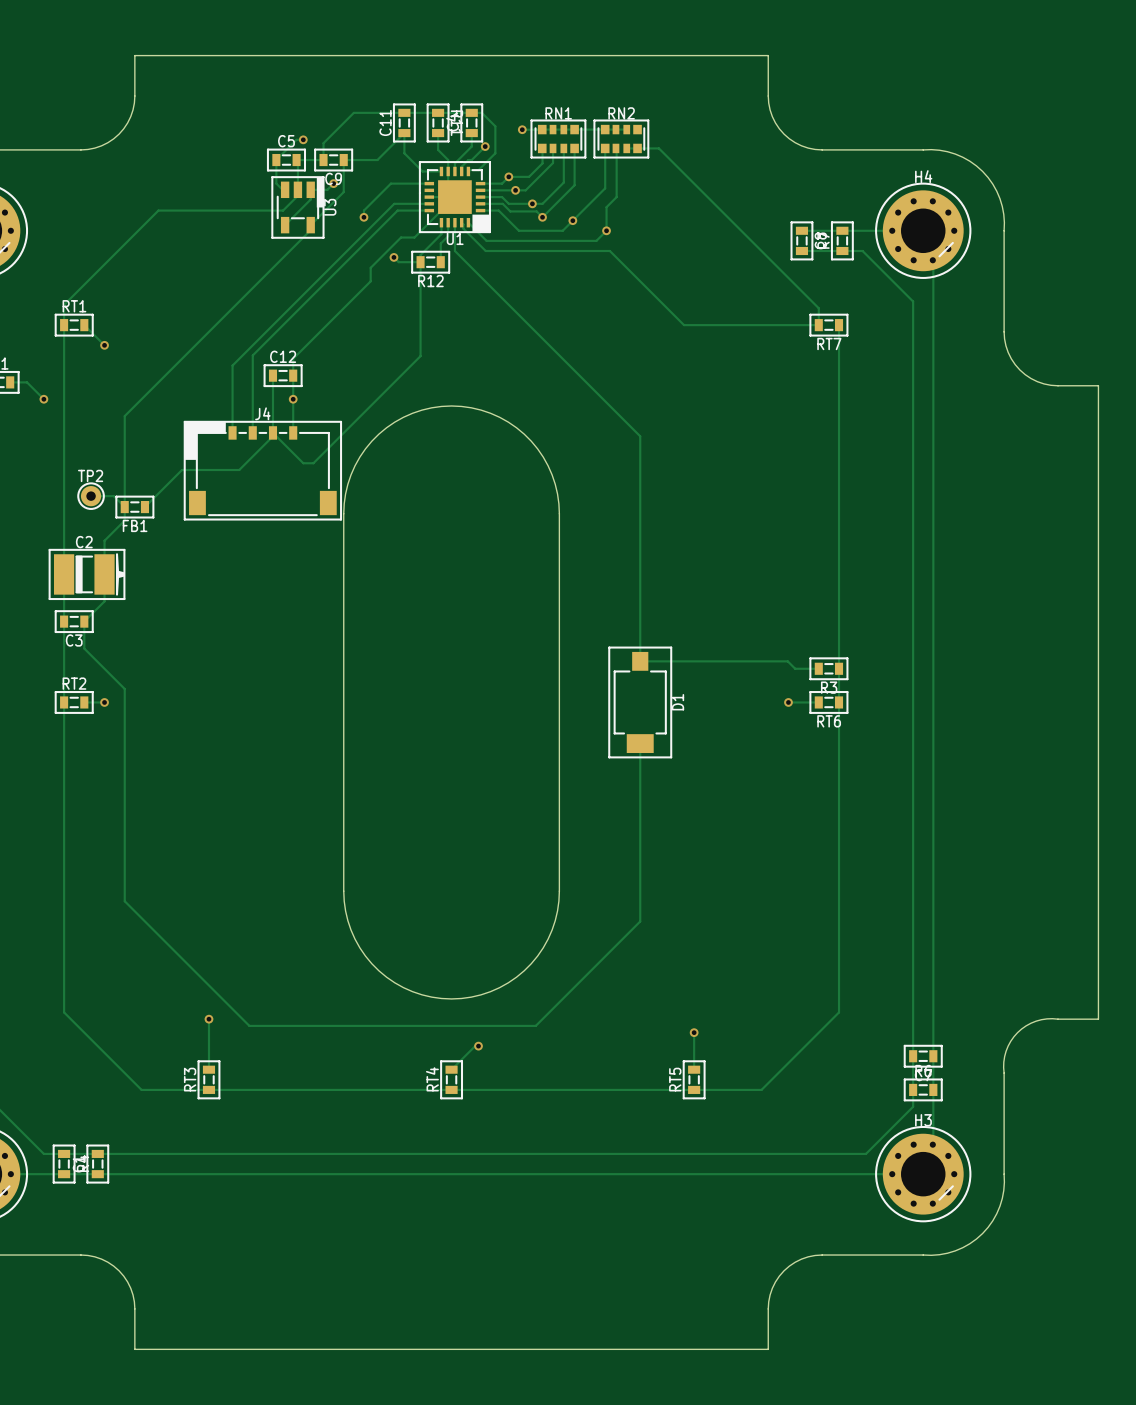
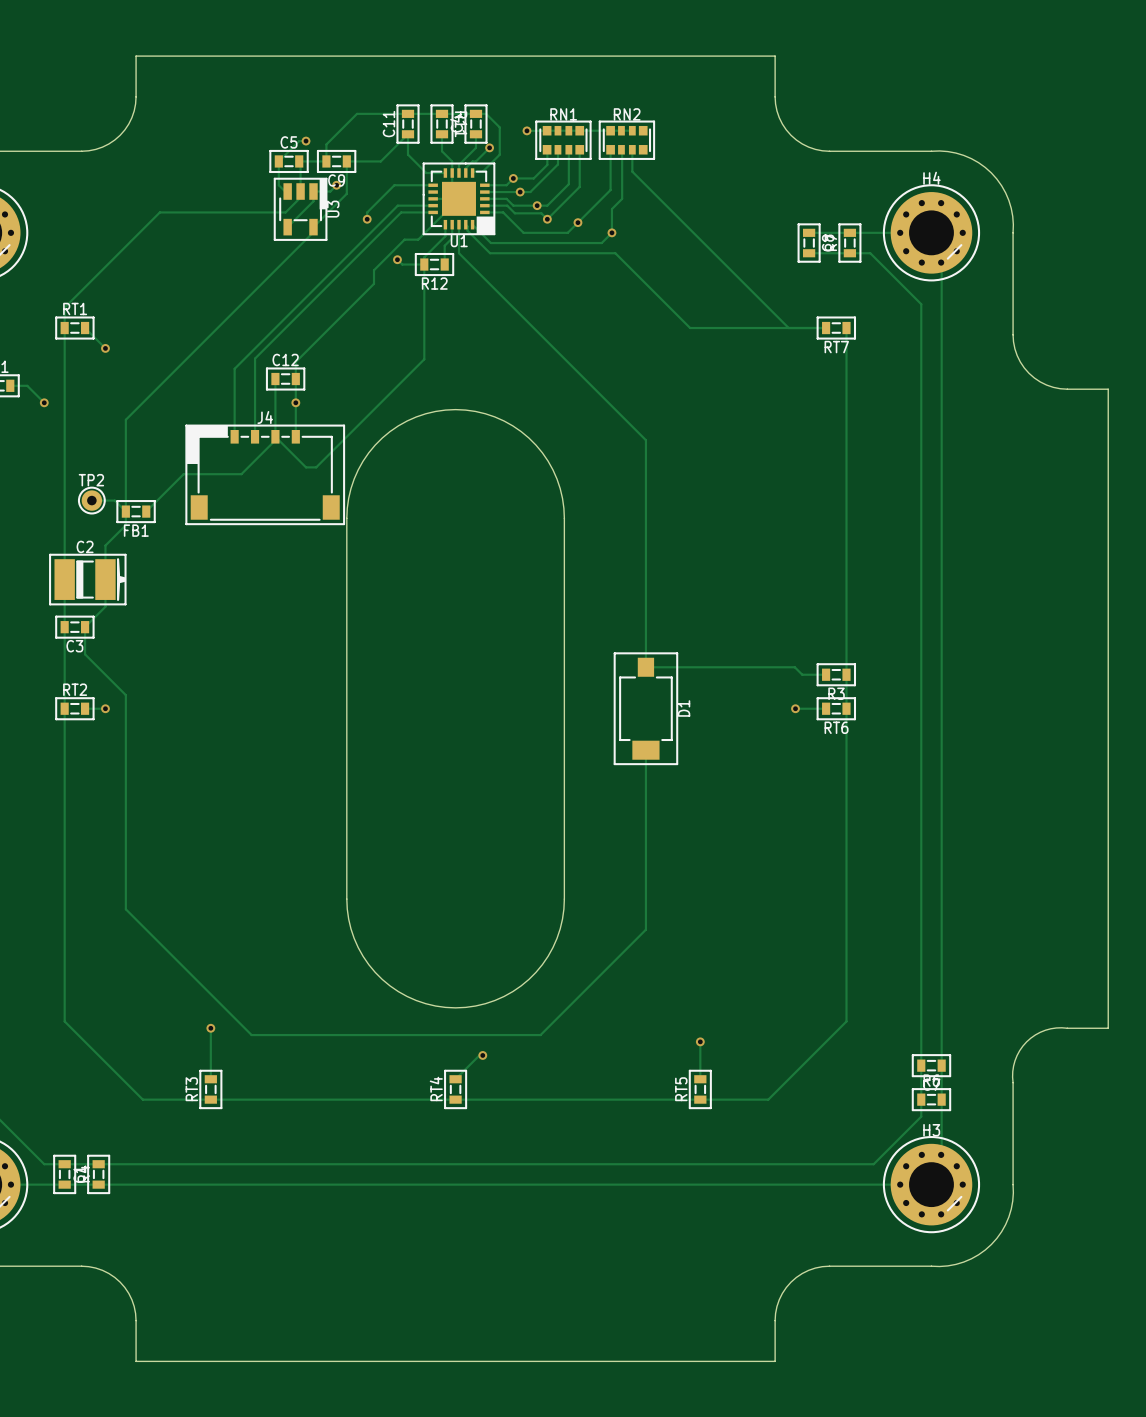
track: (626, 148) (658, 148) (818, 308) (818, 325) -> (632, 149) (632, 171) (788, 328)

